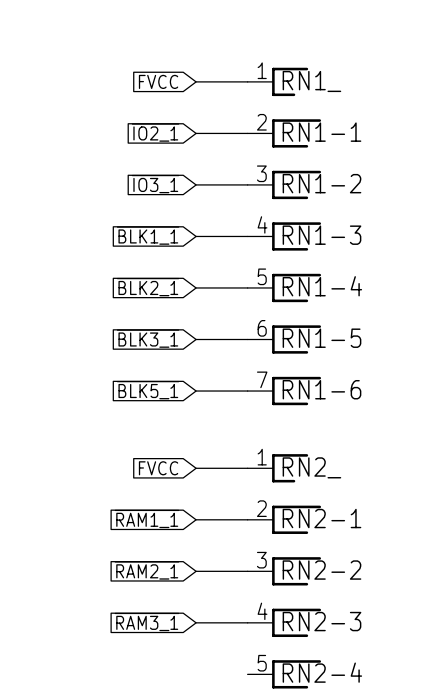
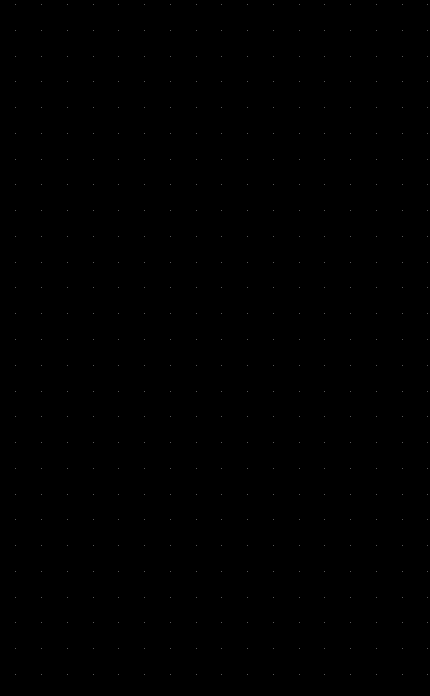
global label: FVCC (158, 81) -> none
wire: (196, 81) (247, 81) -> none
RN1_: (277, 81) -> none
global label: ~{IO2_1} (155, 132) -> none
wire: (196, 133) (247, 133) -> none
RN1-1: (284, 133) -> none
global label: ~{IO3_1} (155, 184) -> none
wire: (196, 184) (247, 184) -> none
RN1-2: (284, 184) -> none
global label: ~{BLK1_1} (148, 235) -> none
wire: (196, 236) (247, 236) -> none
RN1-3: (284, 236) -> none
global label: ~{BLK2_1} (148, 287) -> none
wire: (196, 287) (247, 287) -> none
RN1-4: (284, 287) -> none
global label: ~{BLK3_1} (148, 338) -> none
wire: (196, 339) (247, 339) -> none
RN1-5: (284, 339) -> none
global label: ~{BLK5_1} (148, 390) -> none
wire: (196, 391) (247, 391) -> none
RN1-6: (284, 391) -> none
global label: FVCC (158, 468) -> none
wire: (196, 468) (247, 468) -> none
RN2_: (277, 468) -> none
global label: ~{RAM1_1} (146, 518) -> none
wire: (196, 519) (247, 519) -> none
RN2-1: (284, 519) -> none
global label: ~{RAM2_1} (146, 570) -> none
wire: (196, 571) (247, 571) -> none
RN2-2: (284, 571) -> none
global label: ~{RAM3_1} (146, 621) -> none
wire: (196, 622) (247, 622) -> none
RN2-3: (284, 622) -> none
RN2-4: (284, 674) -> none

